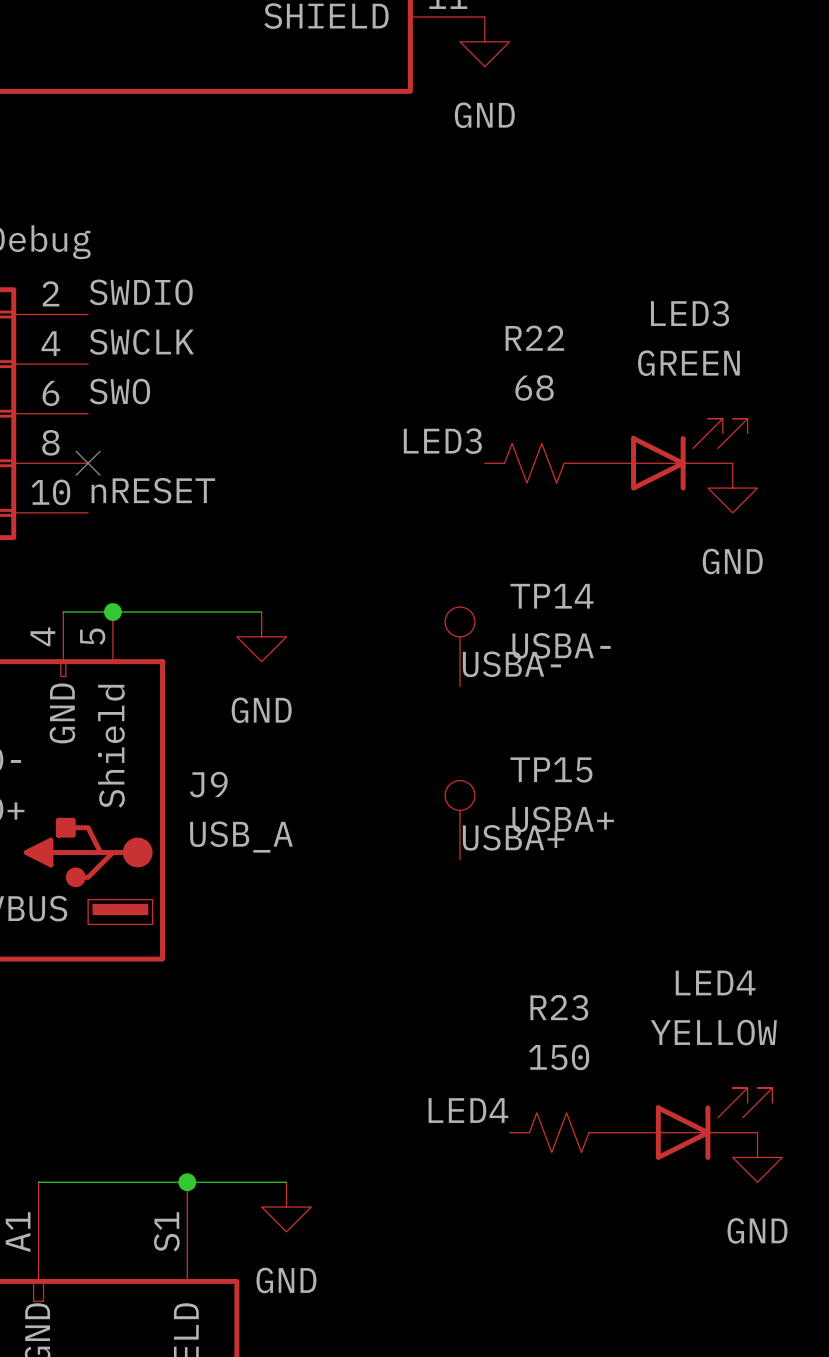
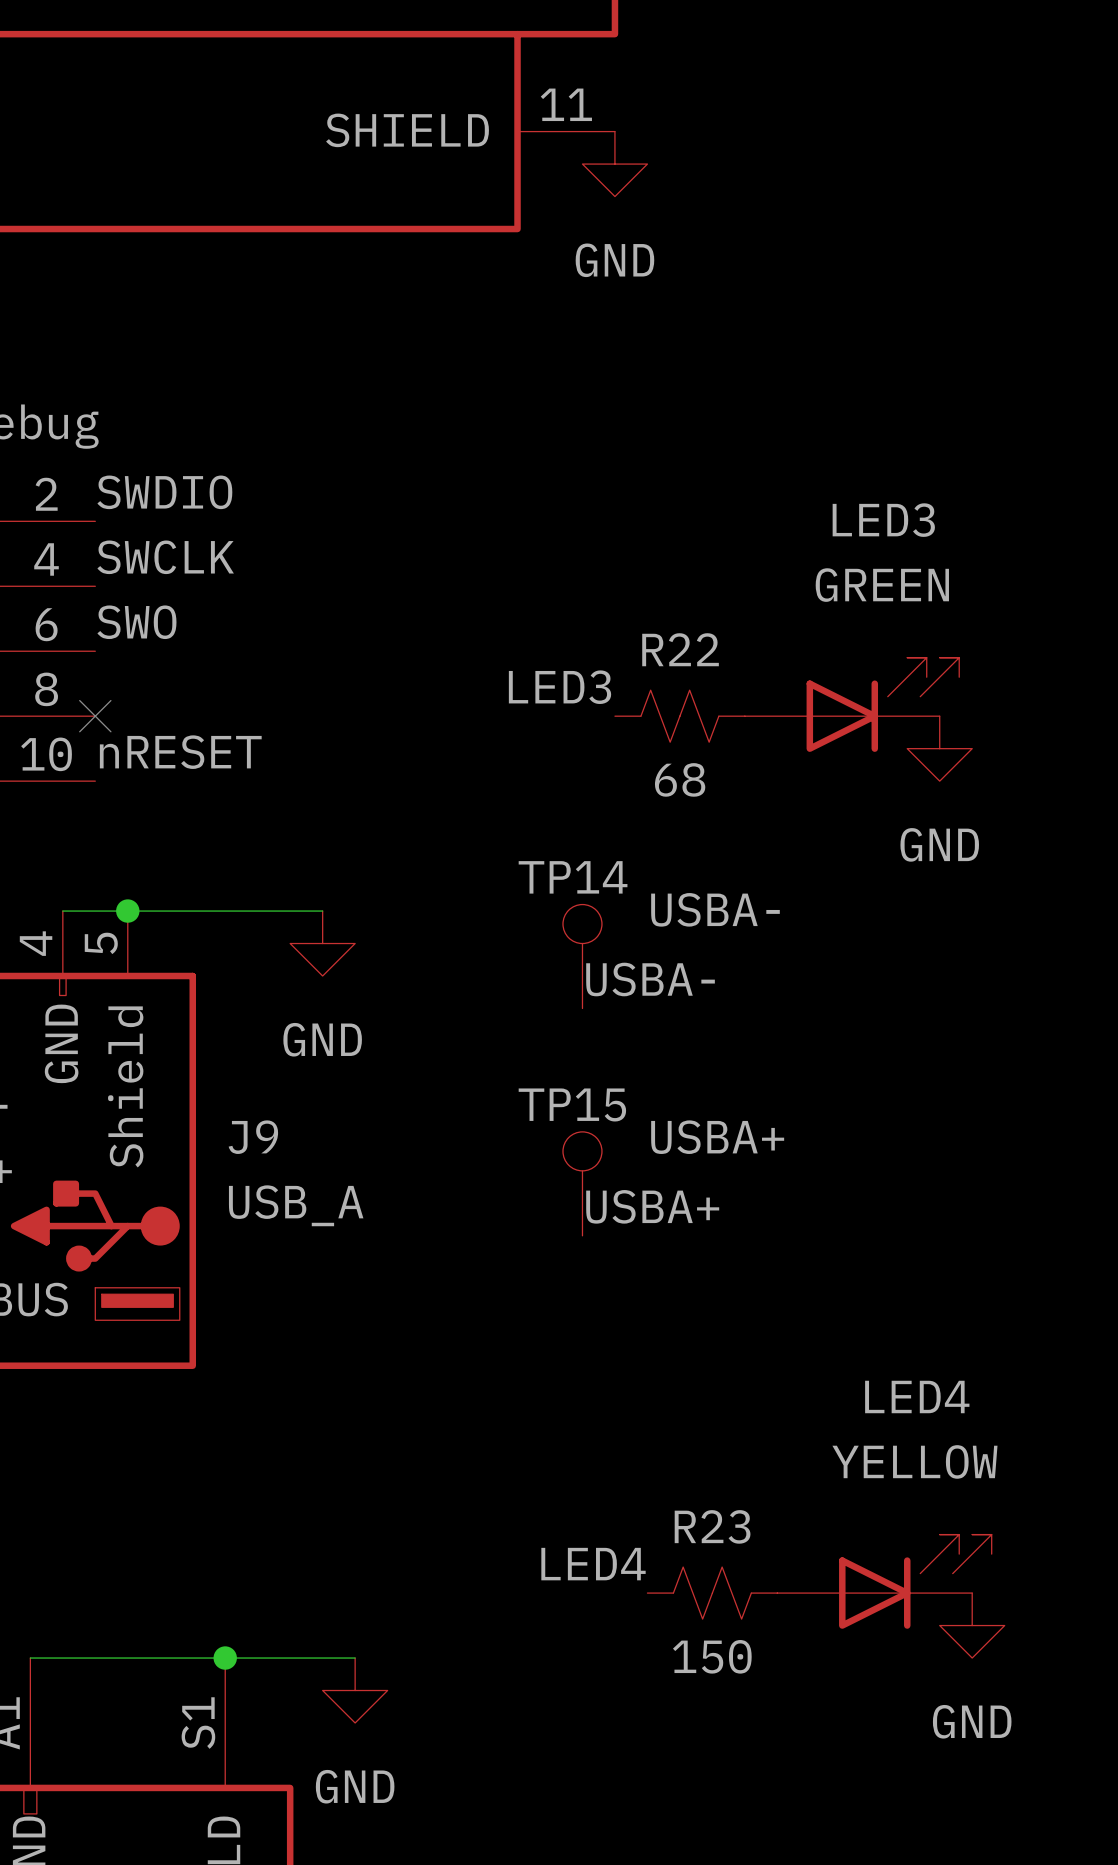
R22 name position: R22 (534, 338) -> R22 (680, 649)
R22 value position: 68 (534, 387) -> 68 (680, 779)
TP14 name position: TP14 (551, 596) -> TP14 (573, 877)
TP14 value position: USBA- (561, 645) -> USBA- (715, 909)
TP15 name position: TP15 (551, 769) -> TP15 (572, 1104)
TP15 value position: USBA+ (563, 819) -> USBA+ (717, 1137)
R23 name position: R23 (559, 1007) -> R23 (712, 1526)
R23 value position: 150 (559, 1057) -> 150 (712, 1656)

